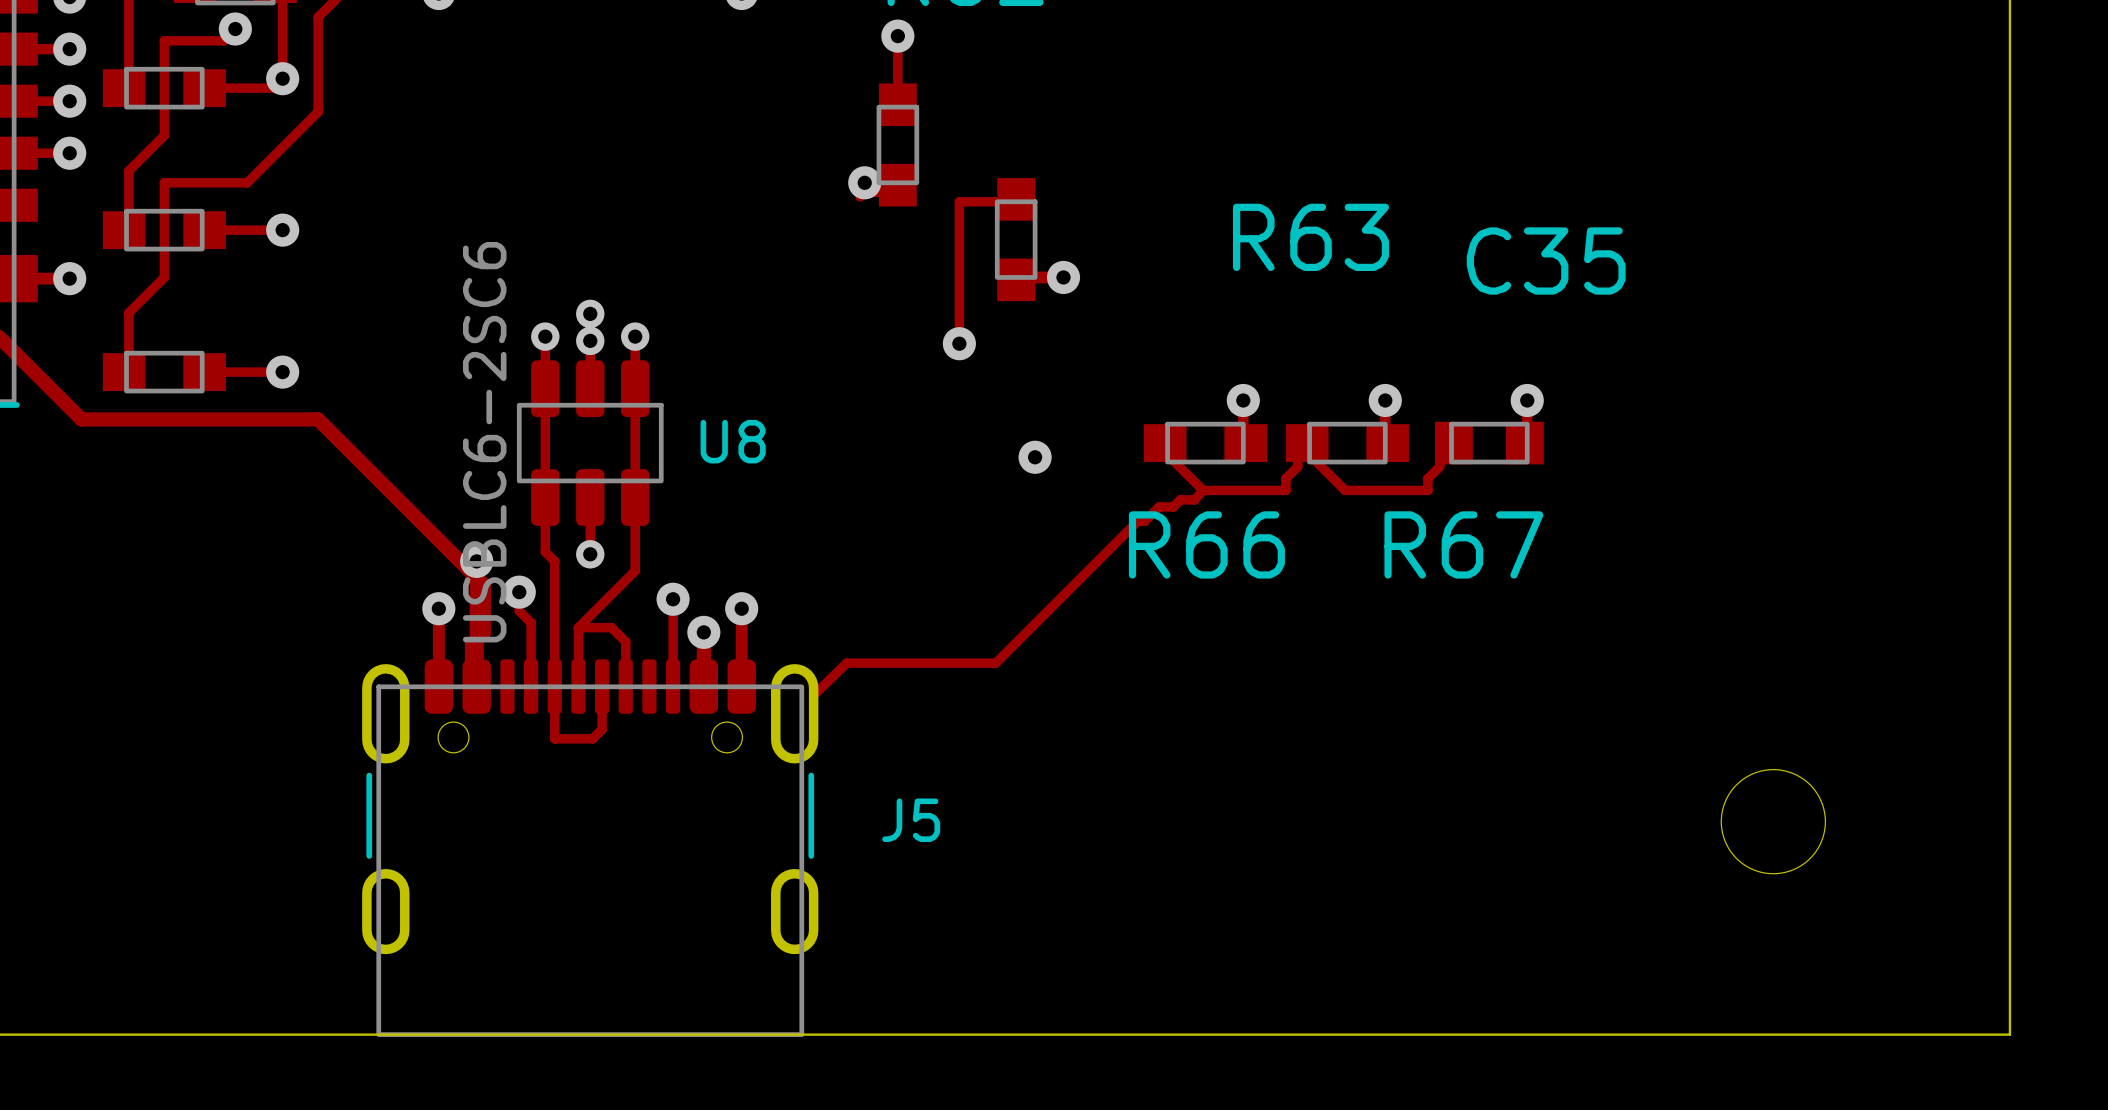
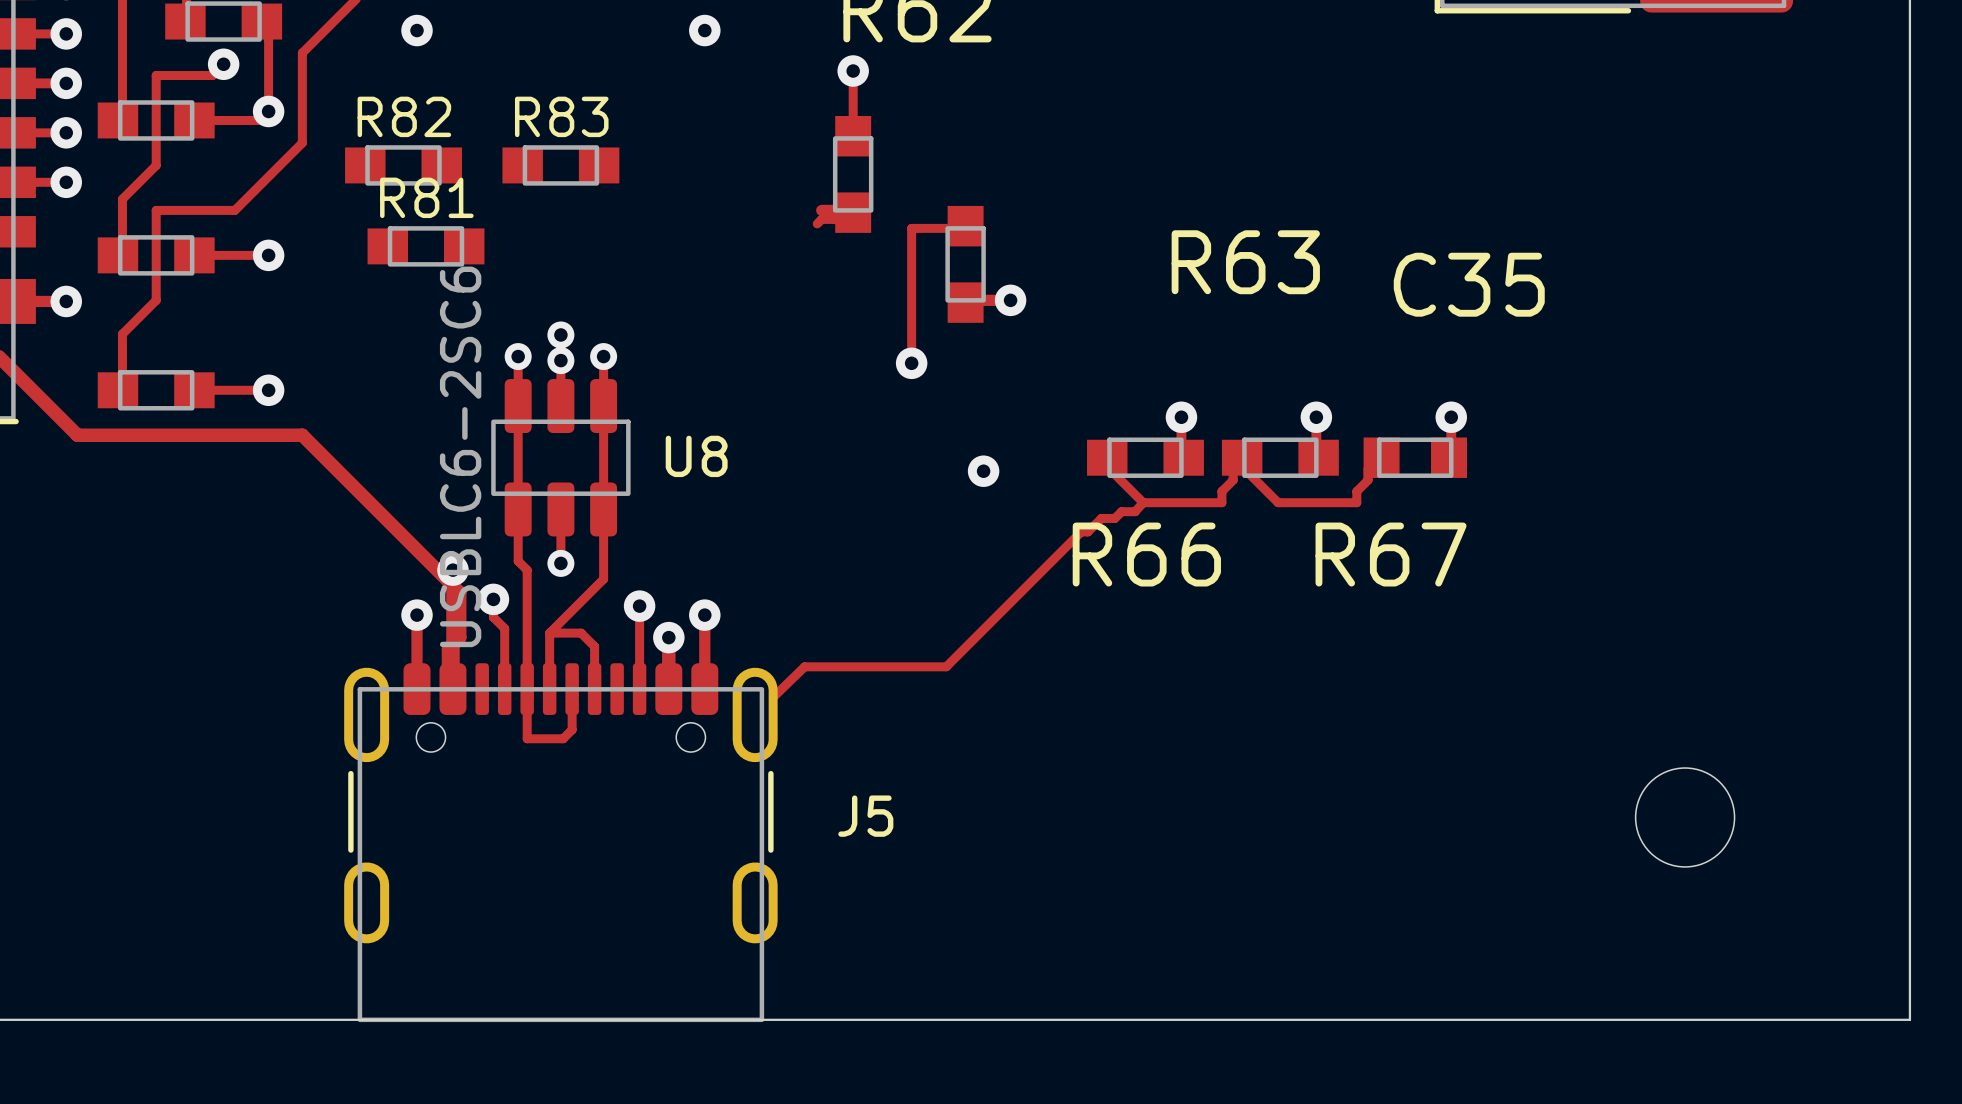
R82: none -> (403, 165)
R83: none -> (560, 165)
via: (864, 182) -> none
R81: none -> (425, 246)

